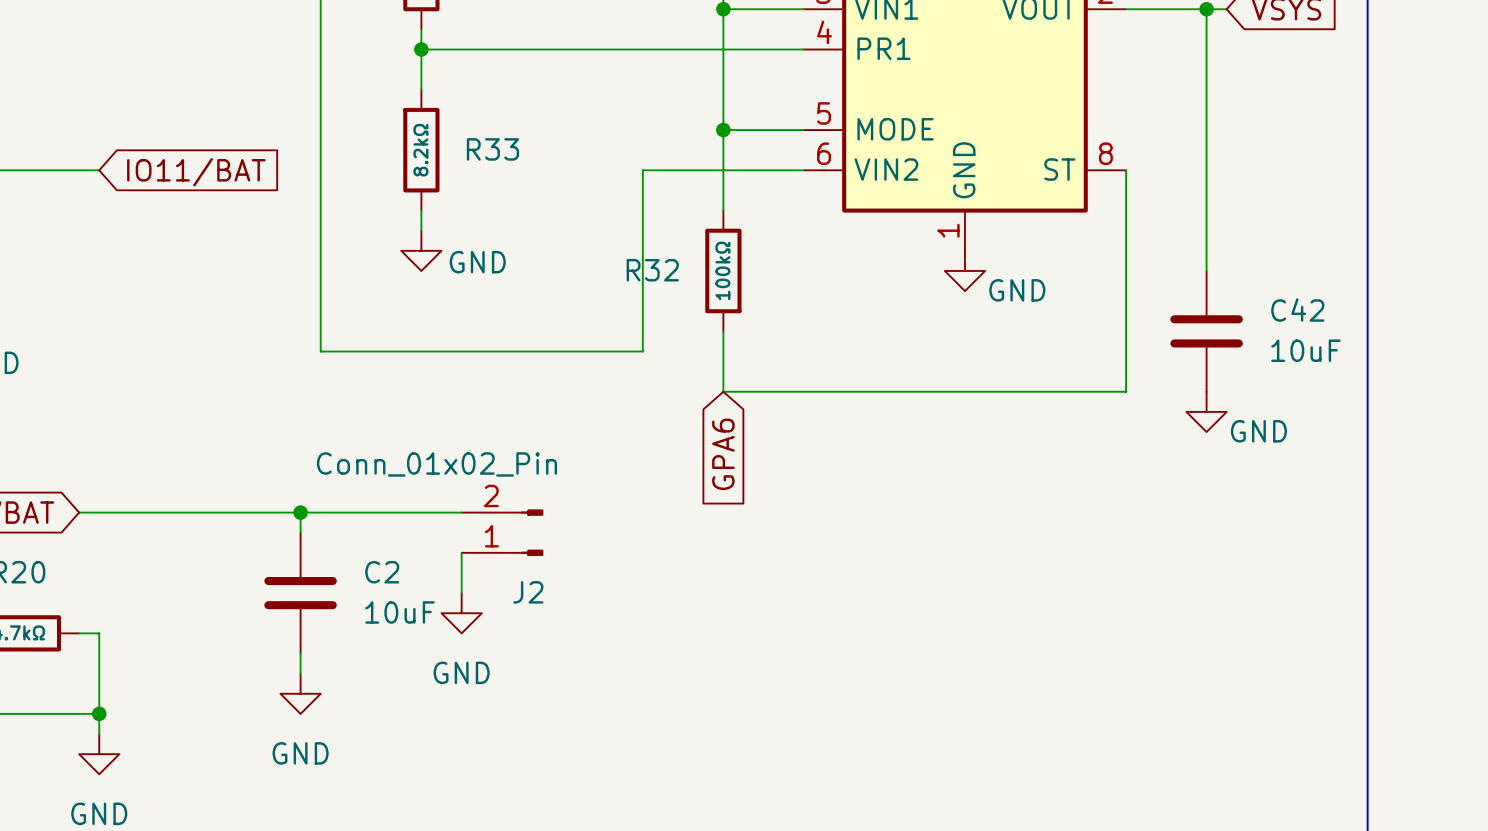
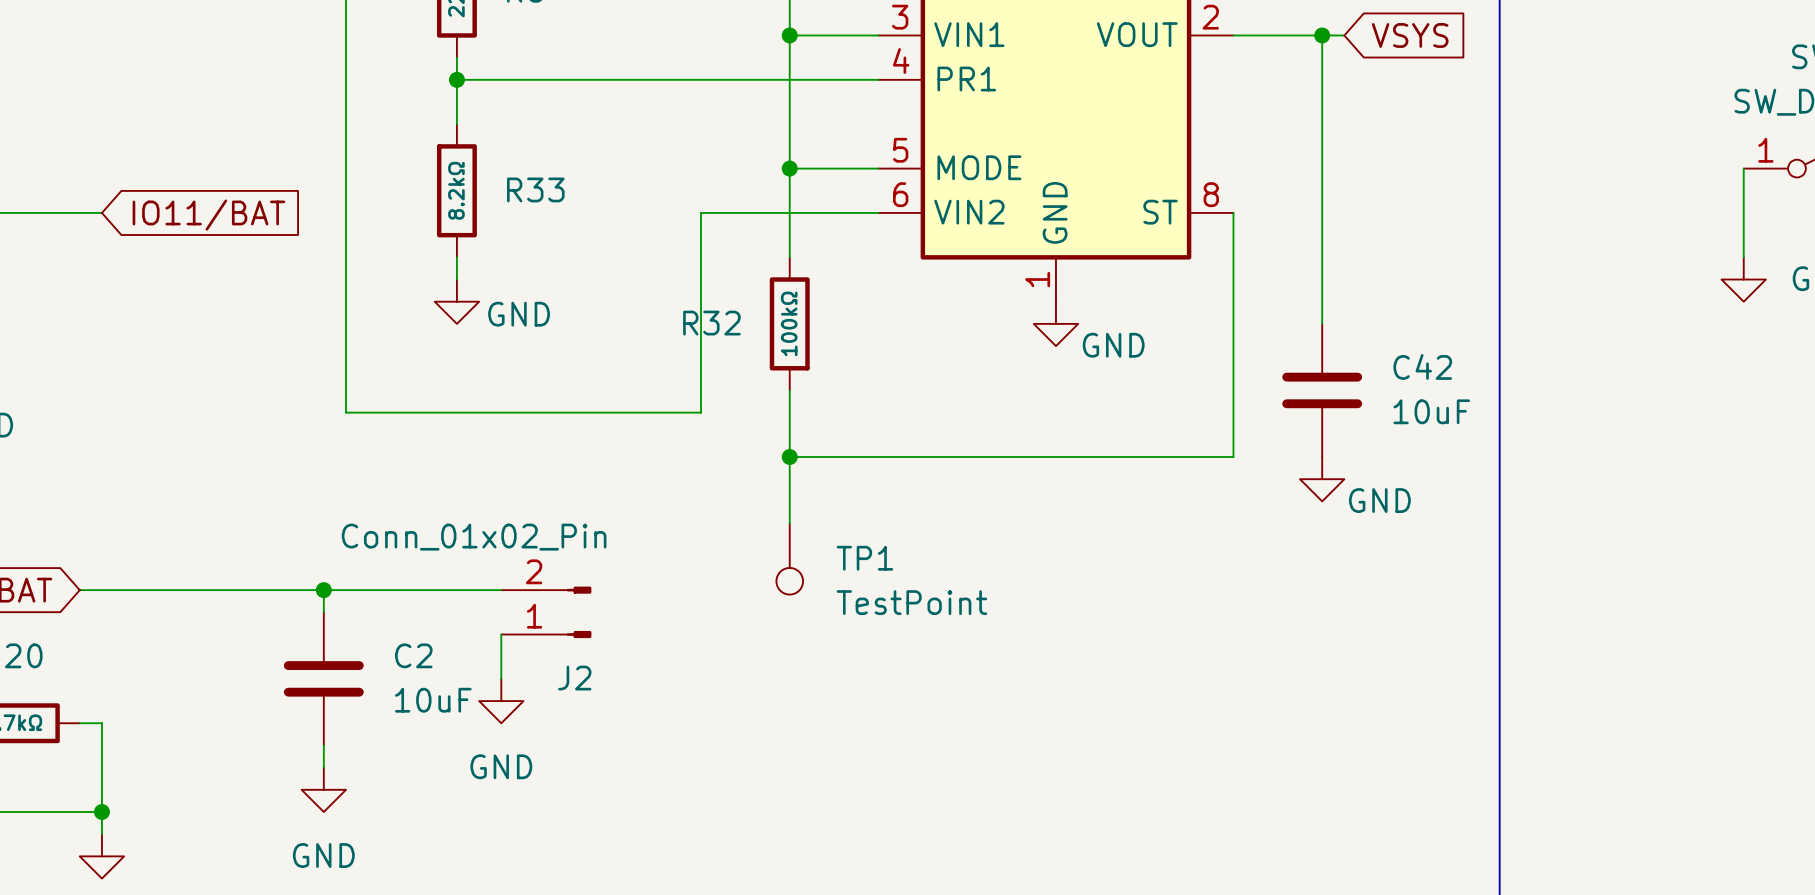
wire: none -> (789, 457) (789, 523)
junction: none -> (789, 457)
global label: GPA6 (723, 454) -> none
TP1: none -> TestPoint (789, 559)

